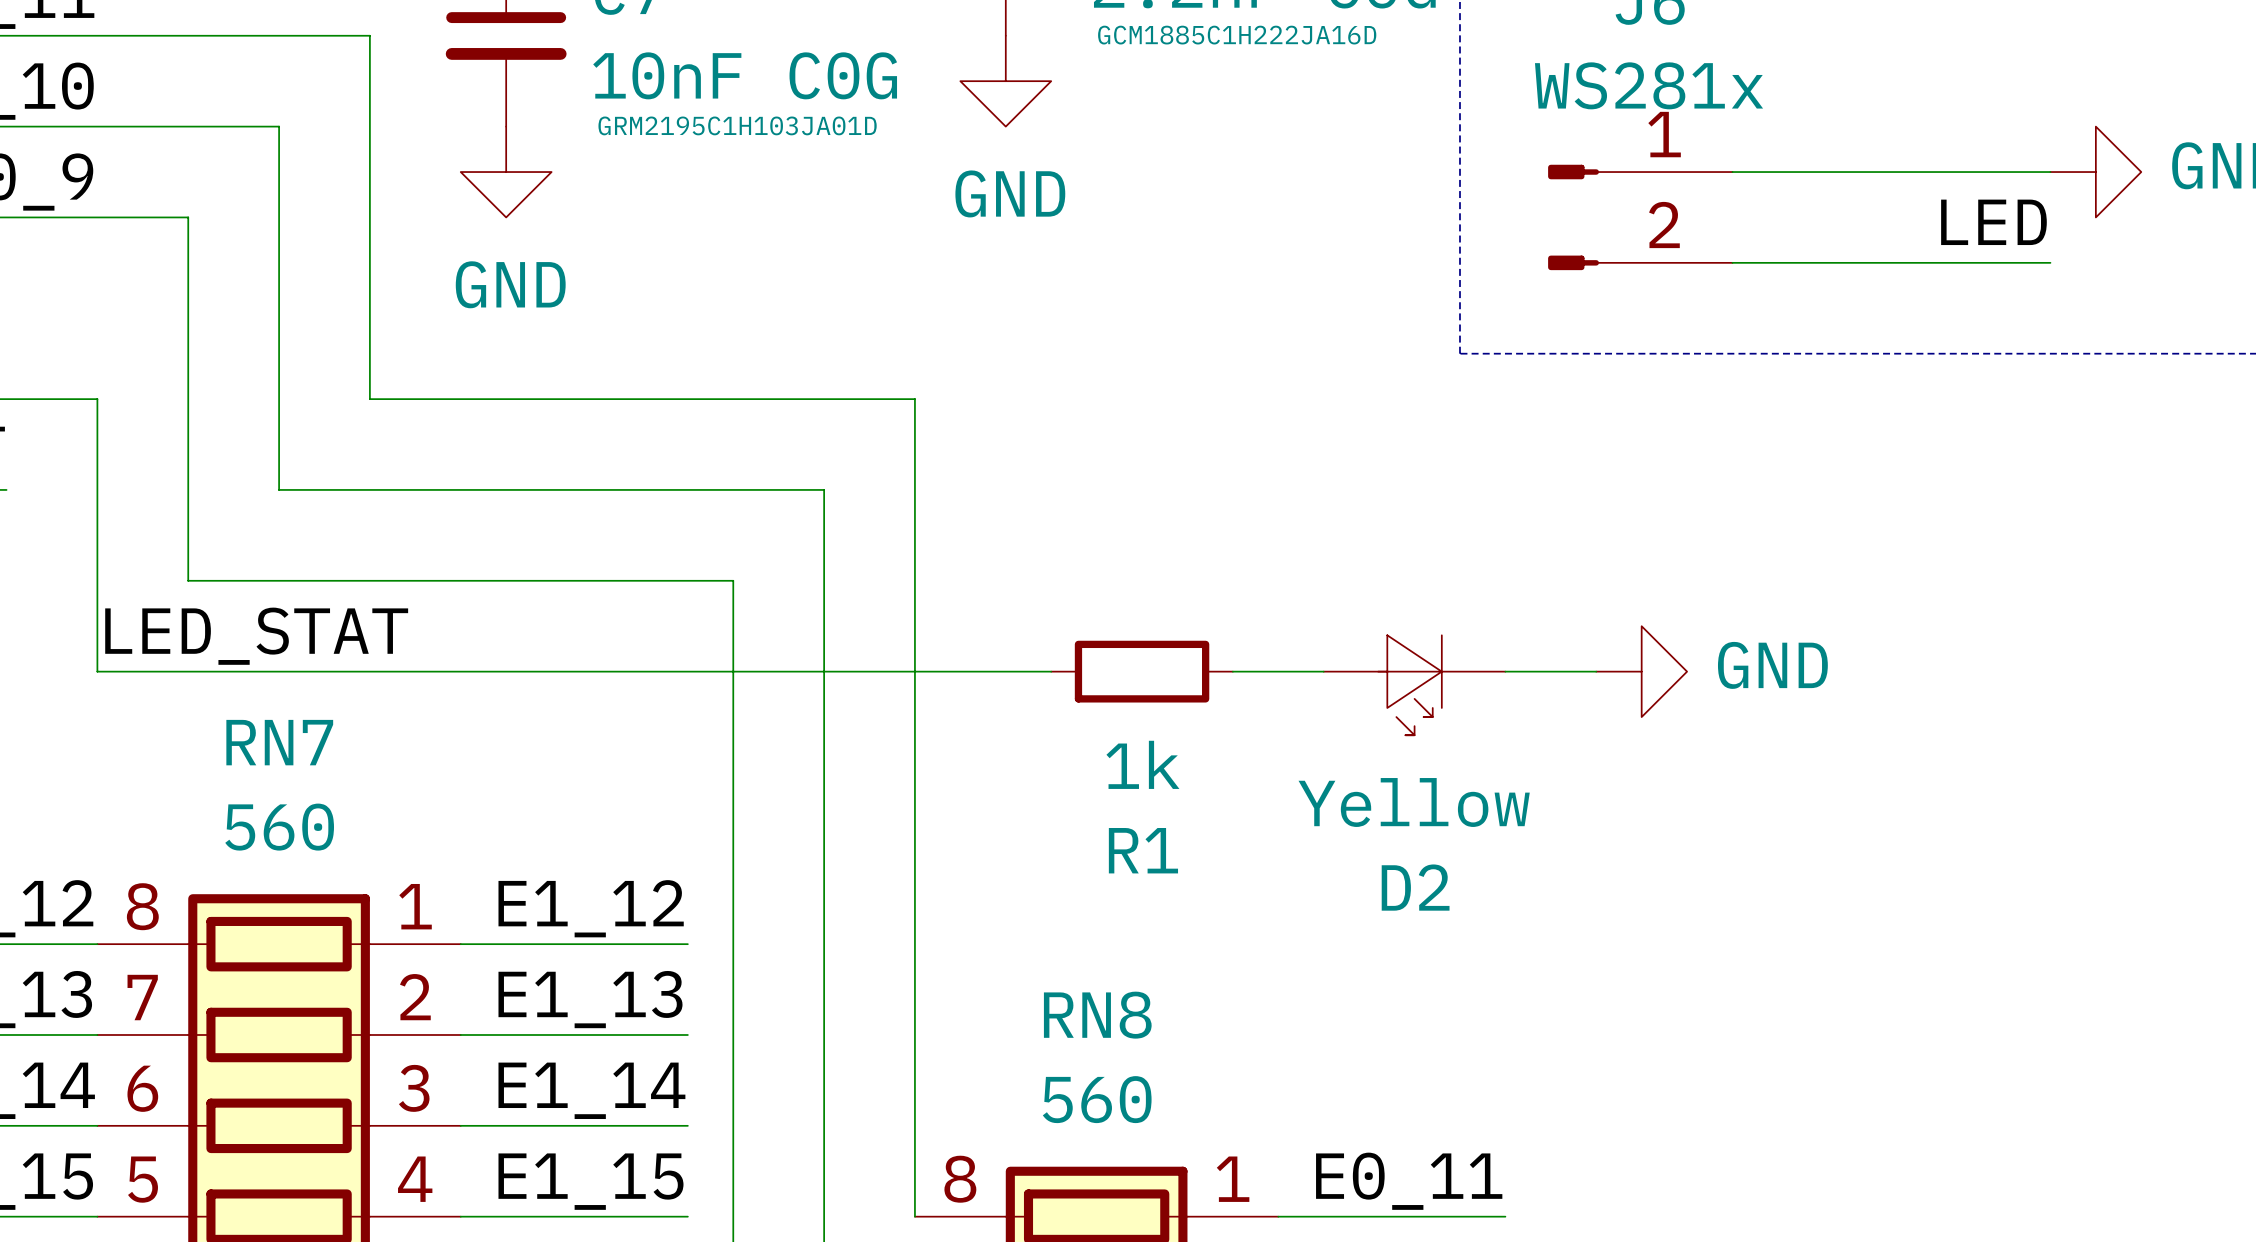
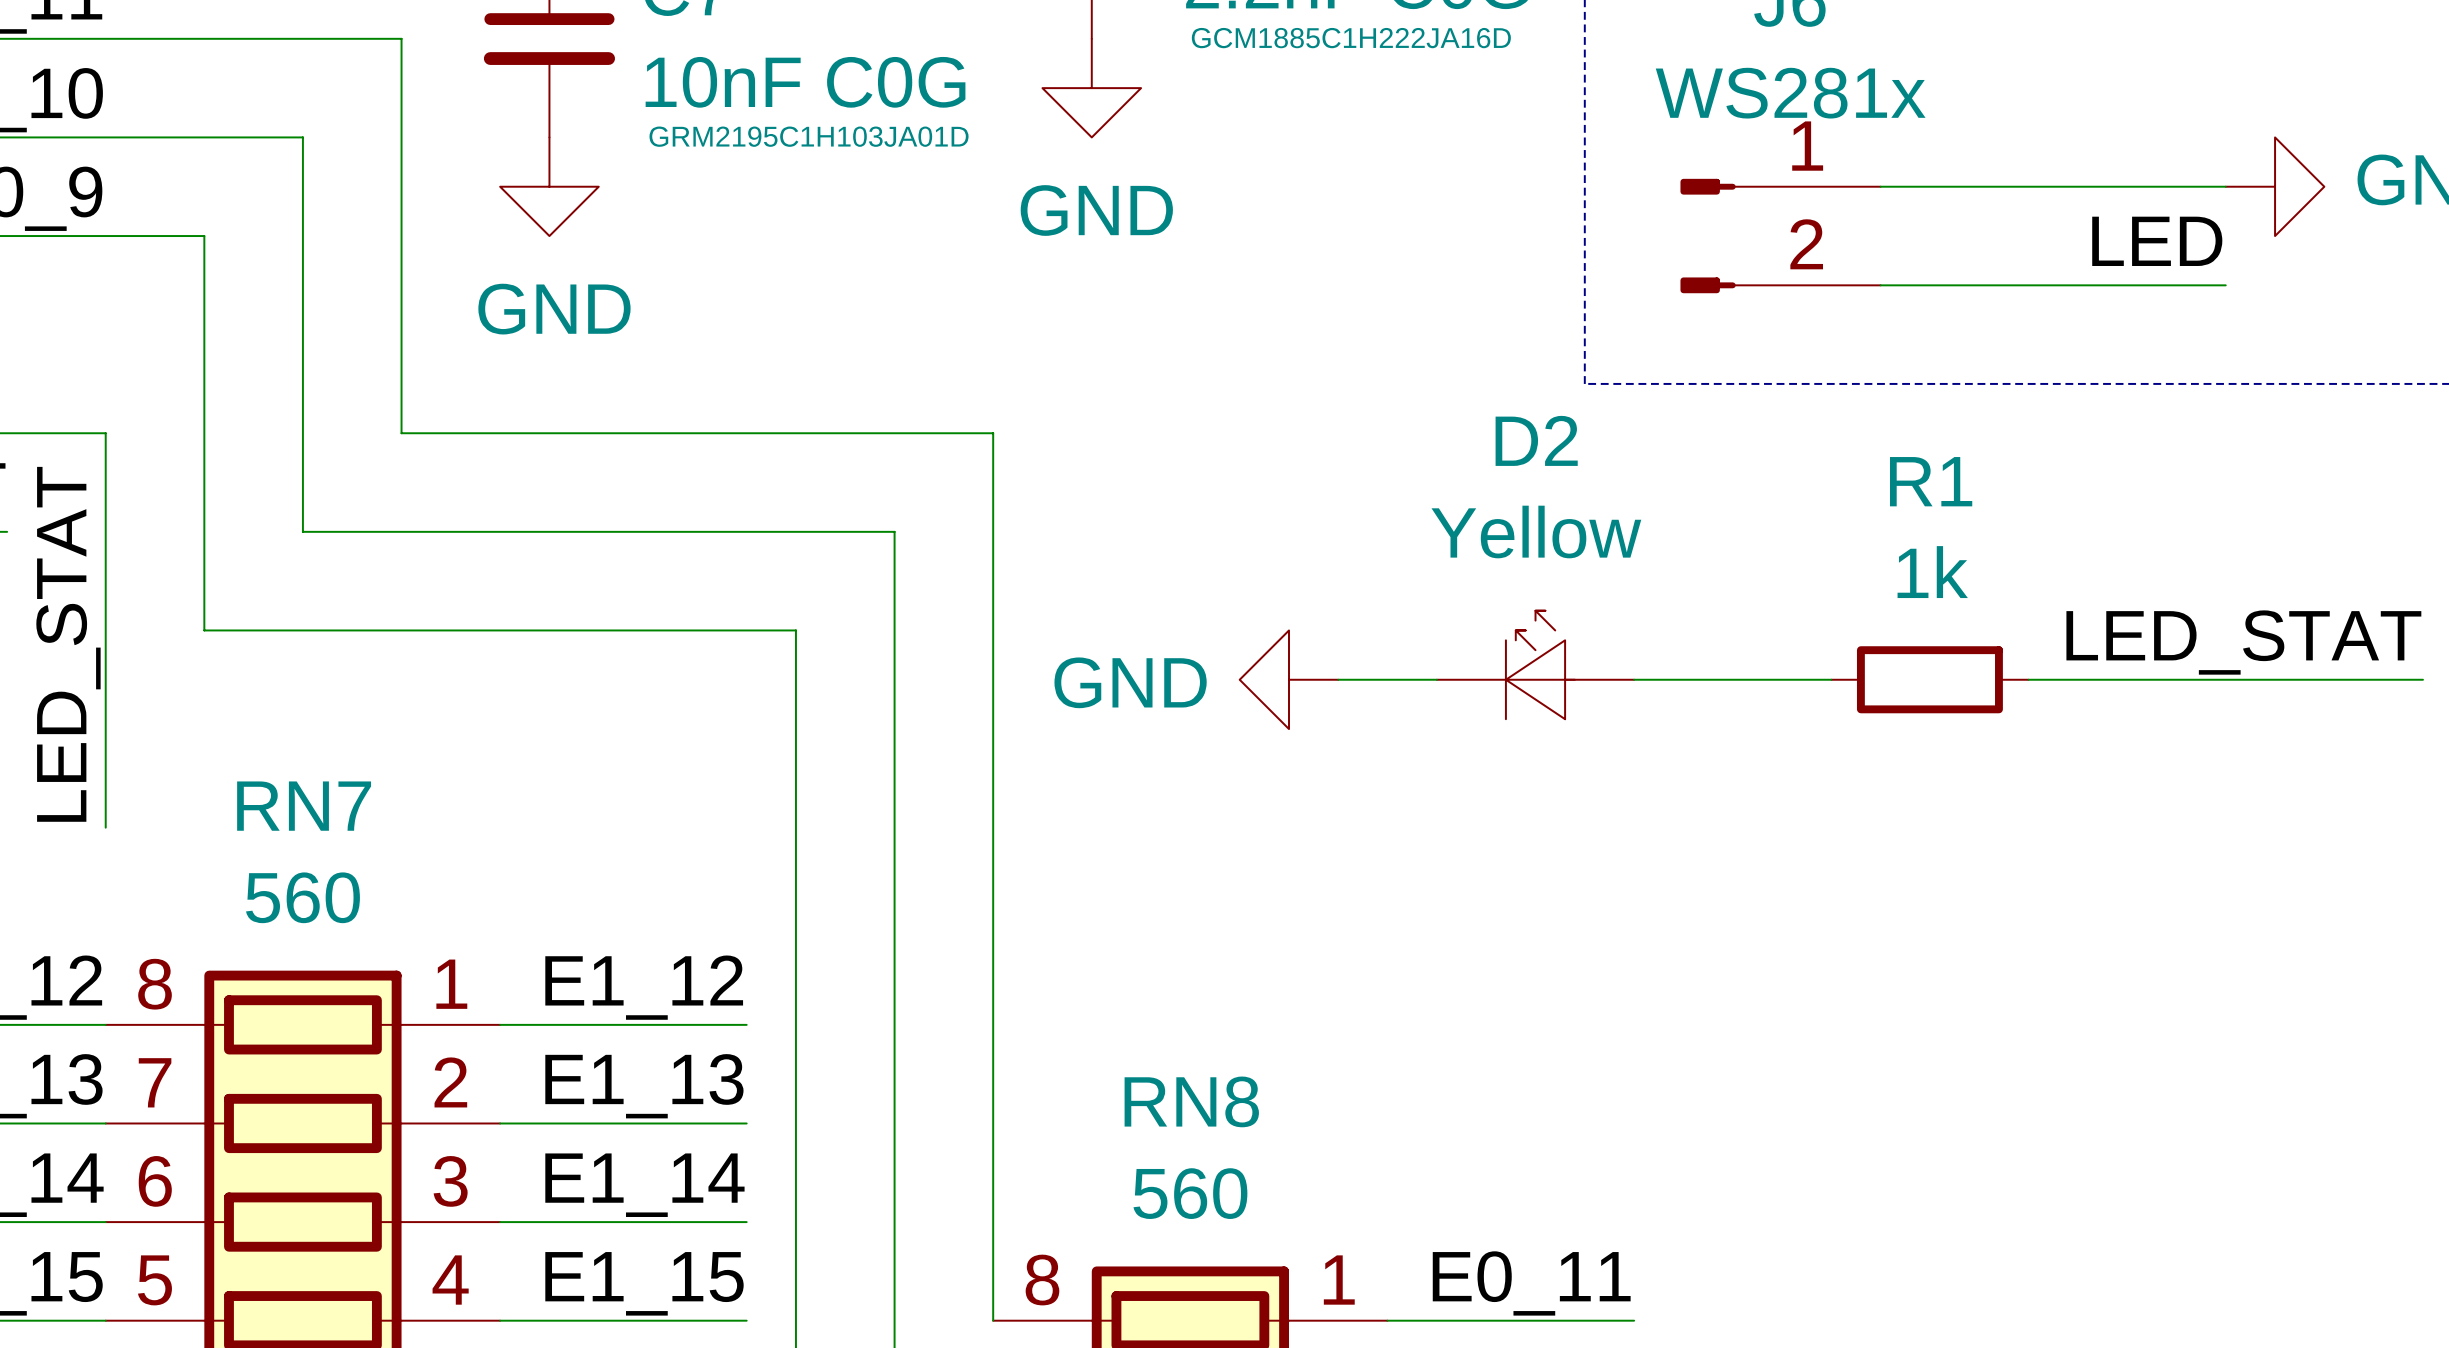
label: none -> LED_STAT (2243, 642)
wire: none -> (1634, 679) (1831, 679)
wire: none -> (2028, 679) (2422, 679)
label rotation: 0° (256, 636) -> 90° counterclockwise (68, 644)
wire: (97, 671) (1051, 671) -> (105, 729) (105, 827)
R1 position: (1142, 671) -> (1929, 679)
wire: (1232, 671) (1323, 671) -> (1338, 679) (1436, 679)
wire: (1505, 671) (1596, 671) -> none
power symbol rotation: 0° (1641, 671) -> 180° (1288, 679)
power symbol position: GND (1641, 671) -> GND (1288, 679)
D2 rotation: 0° (1410, 685) -> 180° (1540, 664)
R1 value position: 1k (1142, 764) -> 1k (1932, 572)
R1 name position: R1 (1143, 850) -> R1 (1931, 481)

